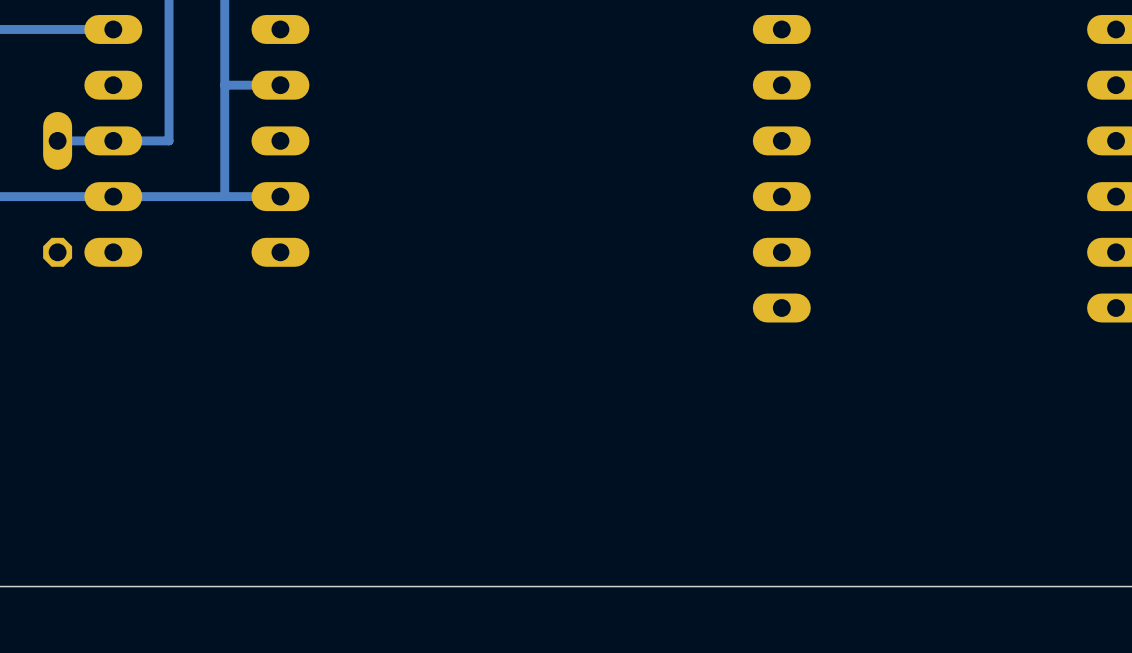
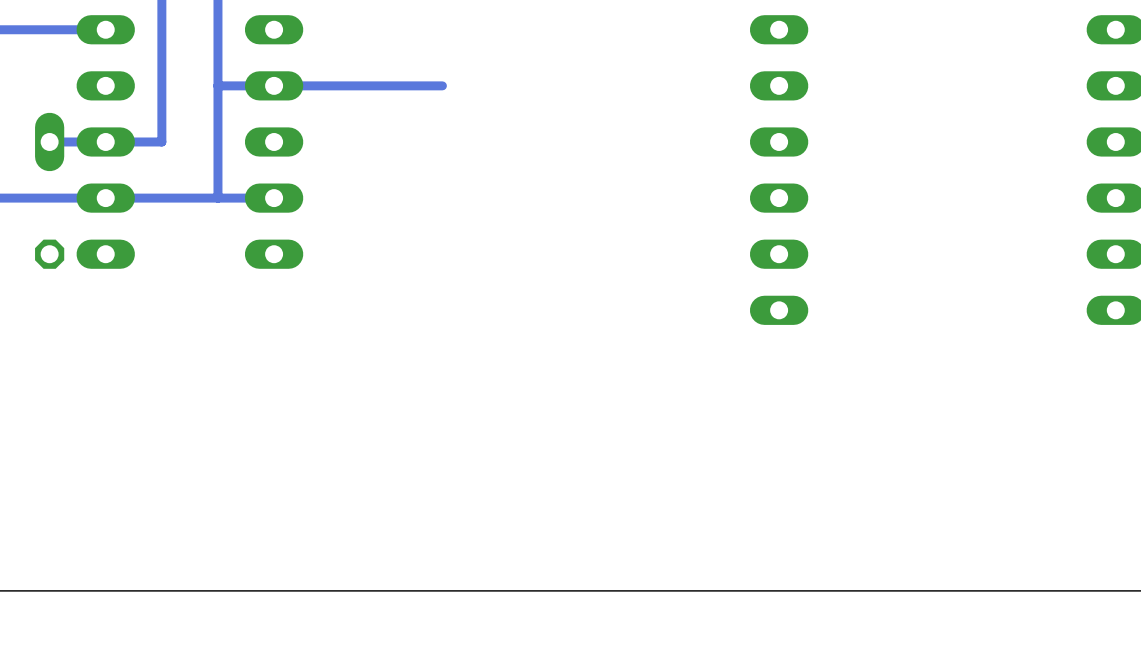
track: none -> (442, 85) (274, 85)

